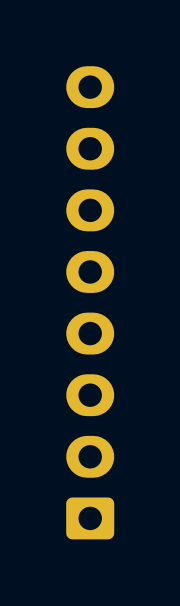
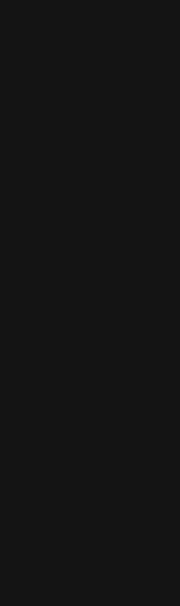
part: (90, 302) -> none

